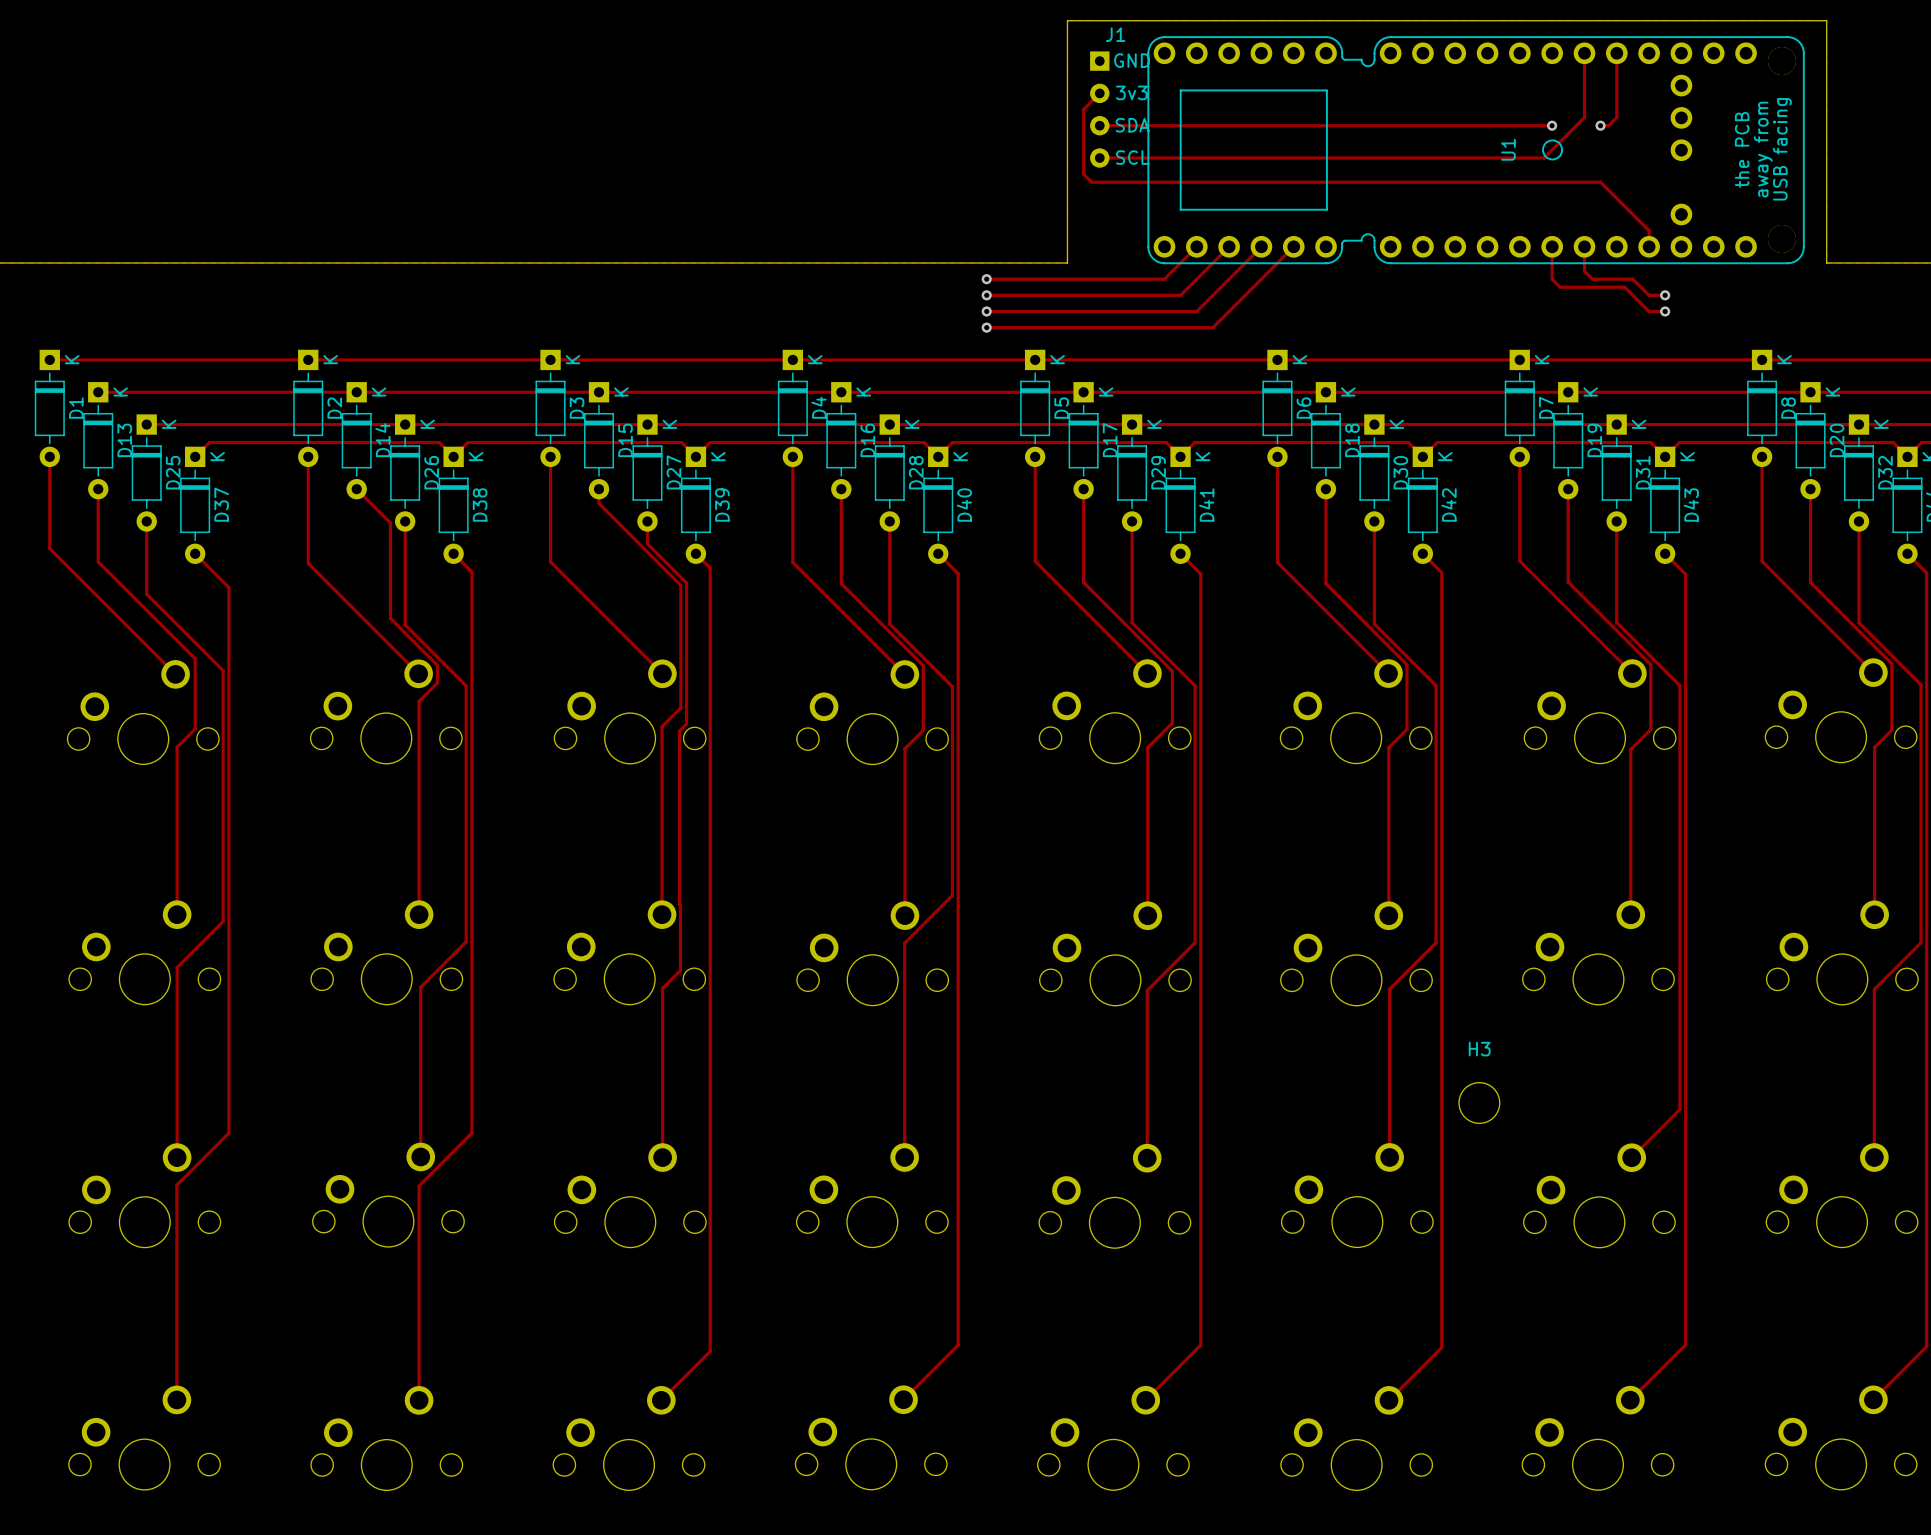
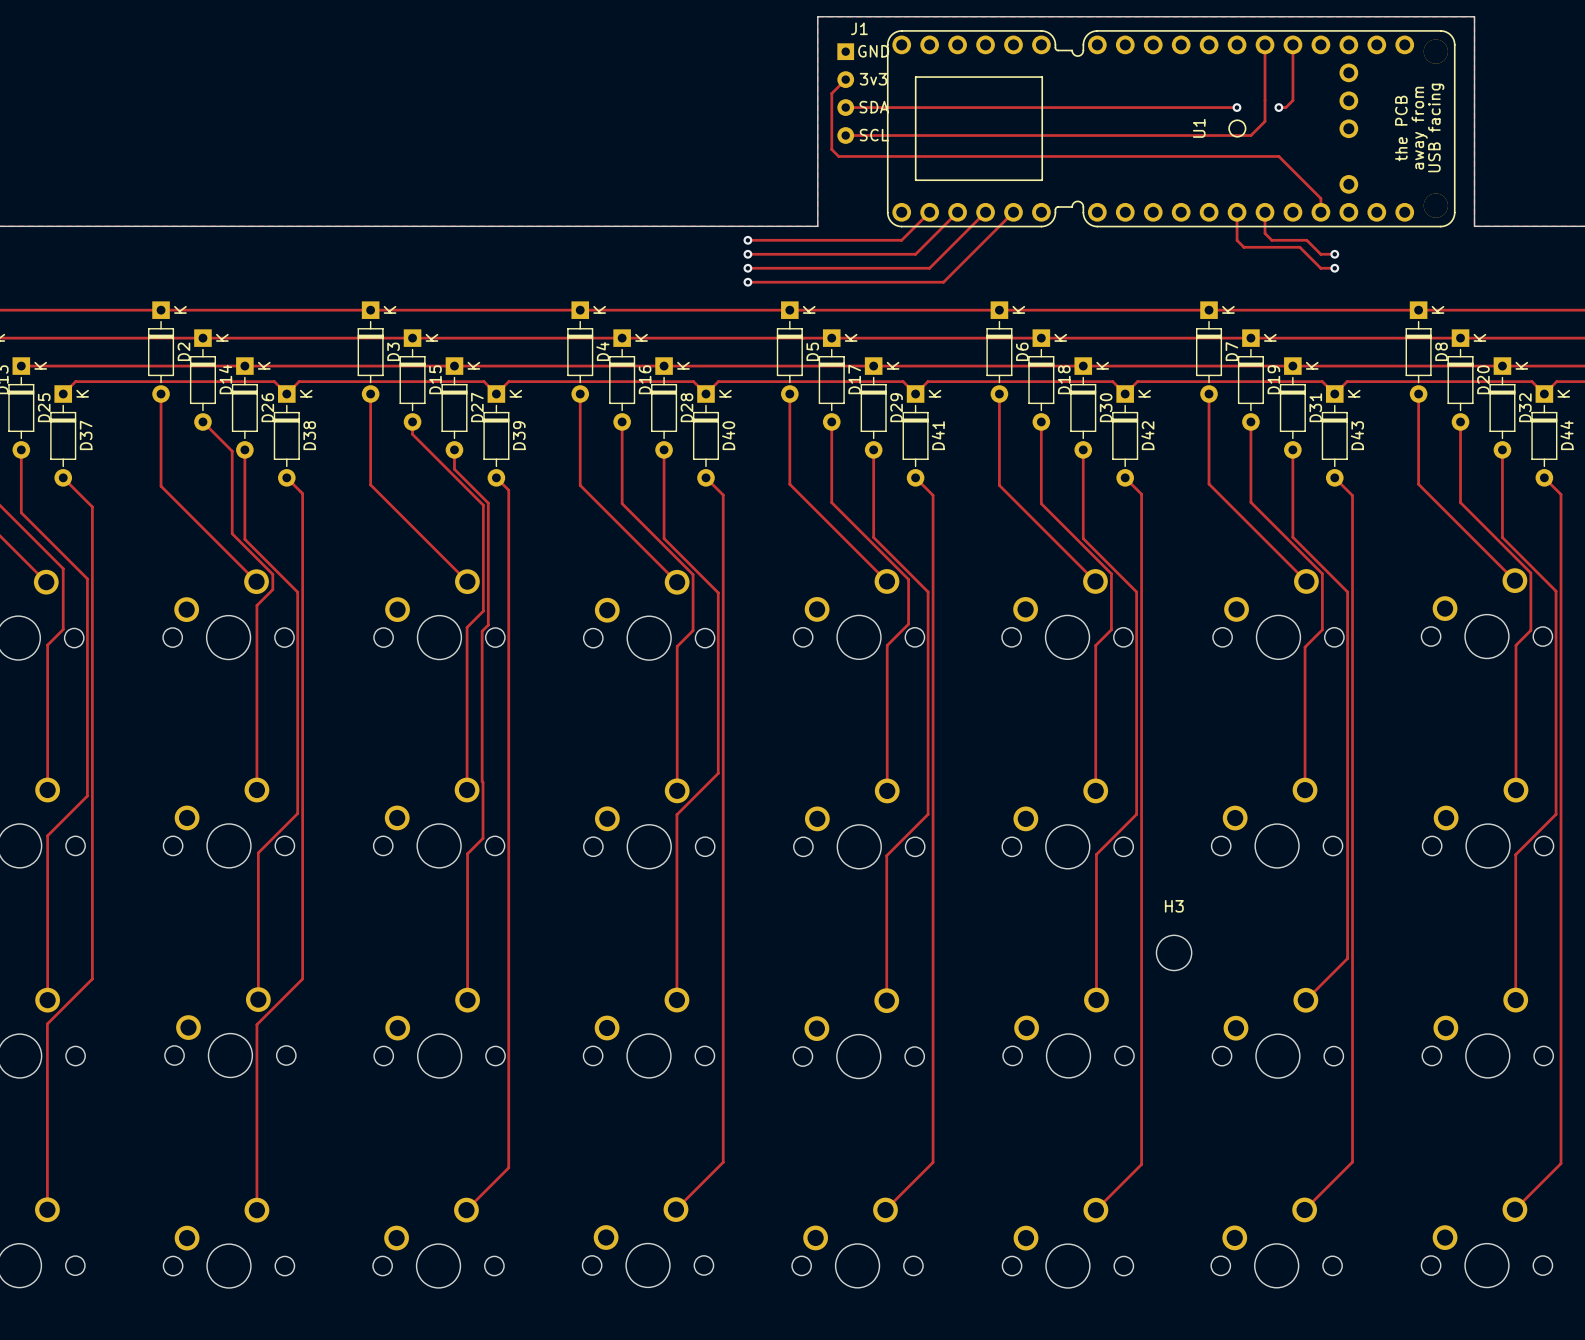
track: (1584, 117) (1544, 158) -> (1265, 100) (1265, 121) (1250, 135) (1229, 135)

